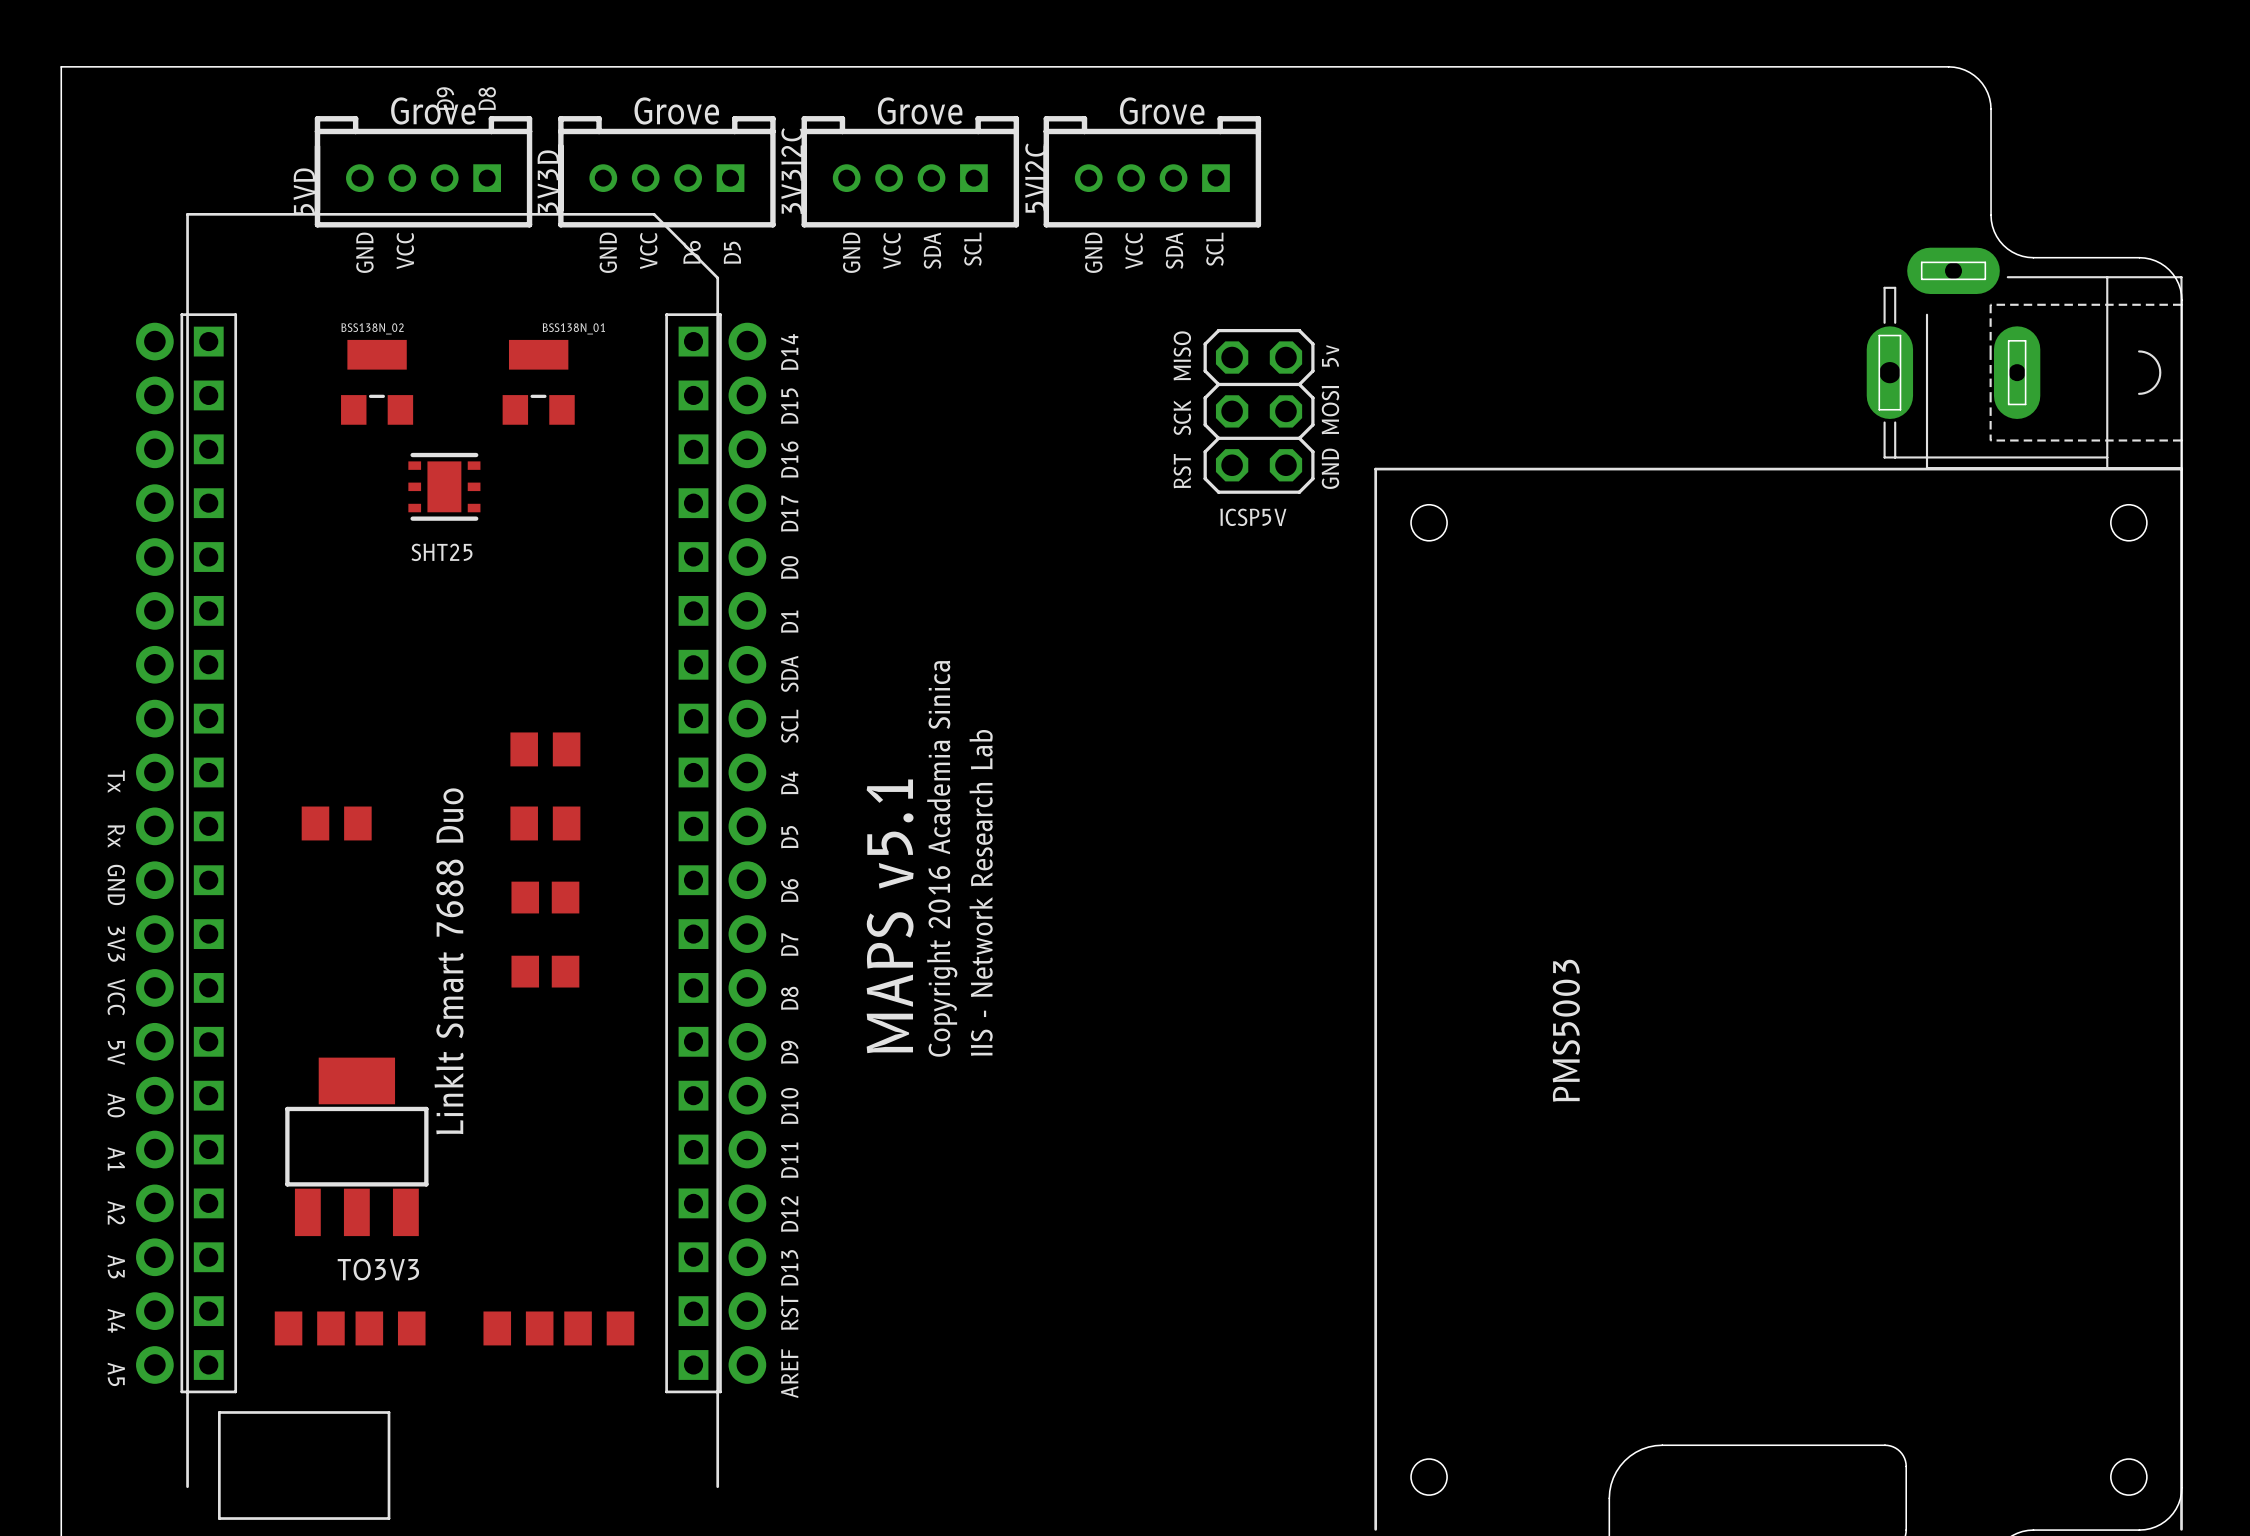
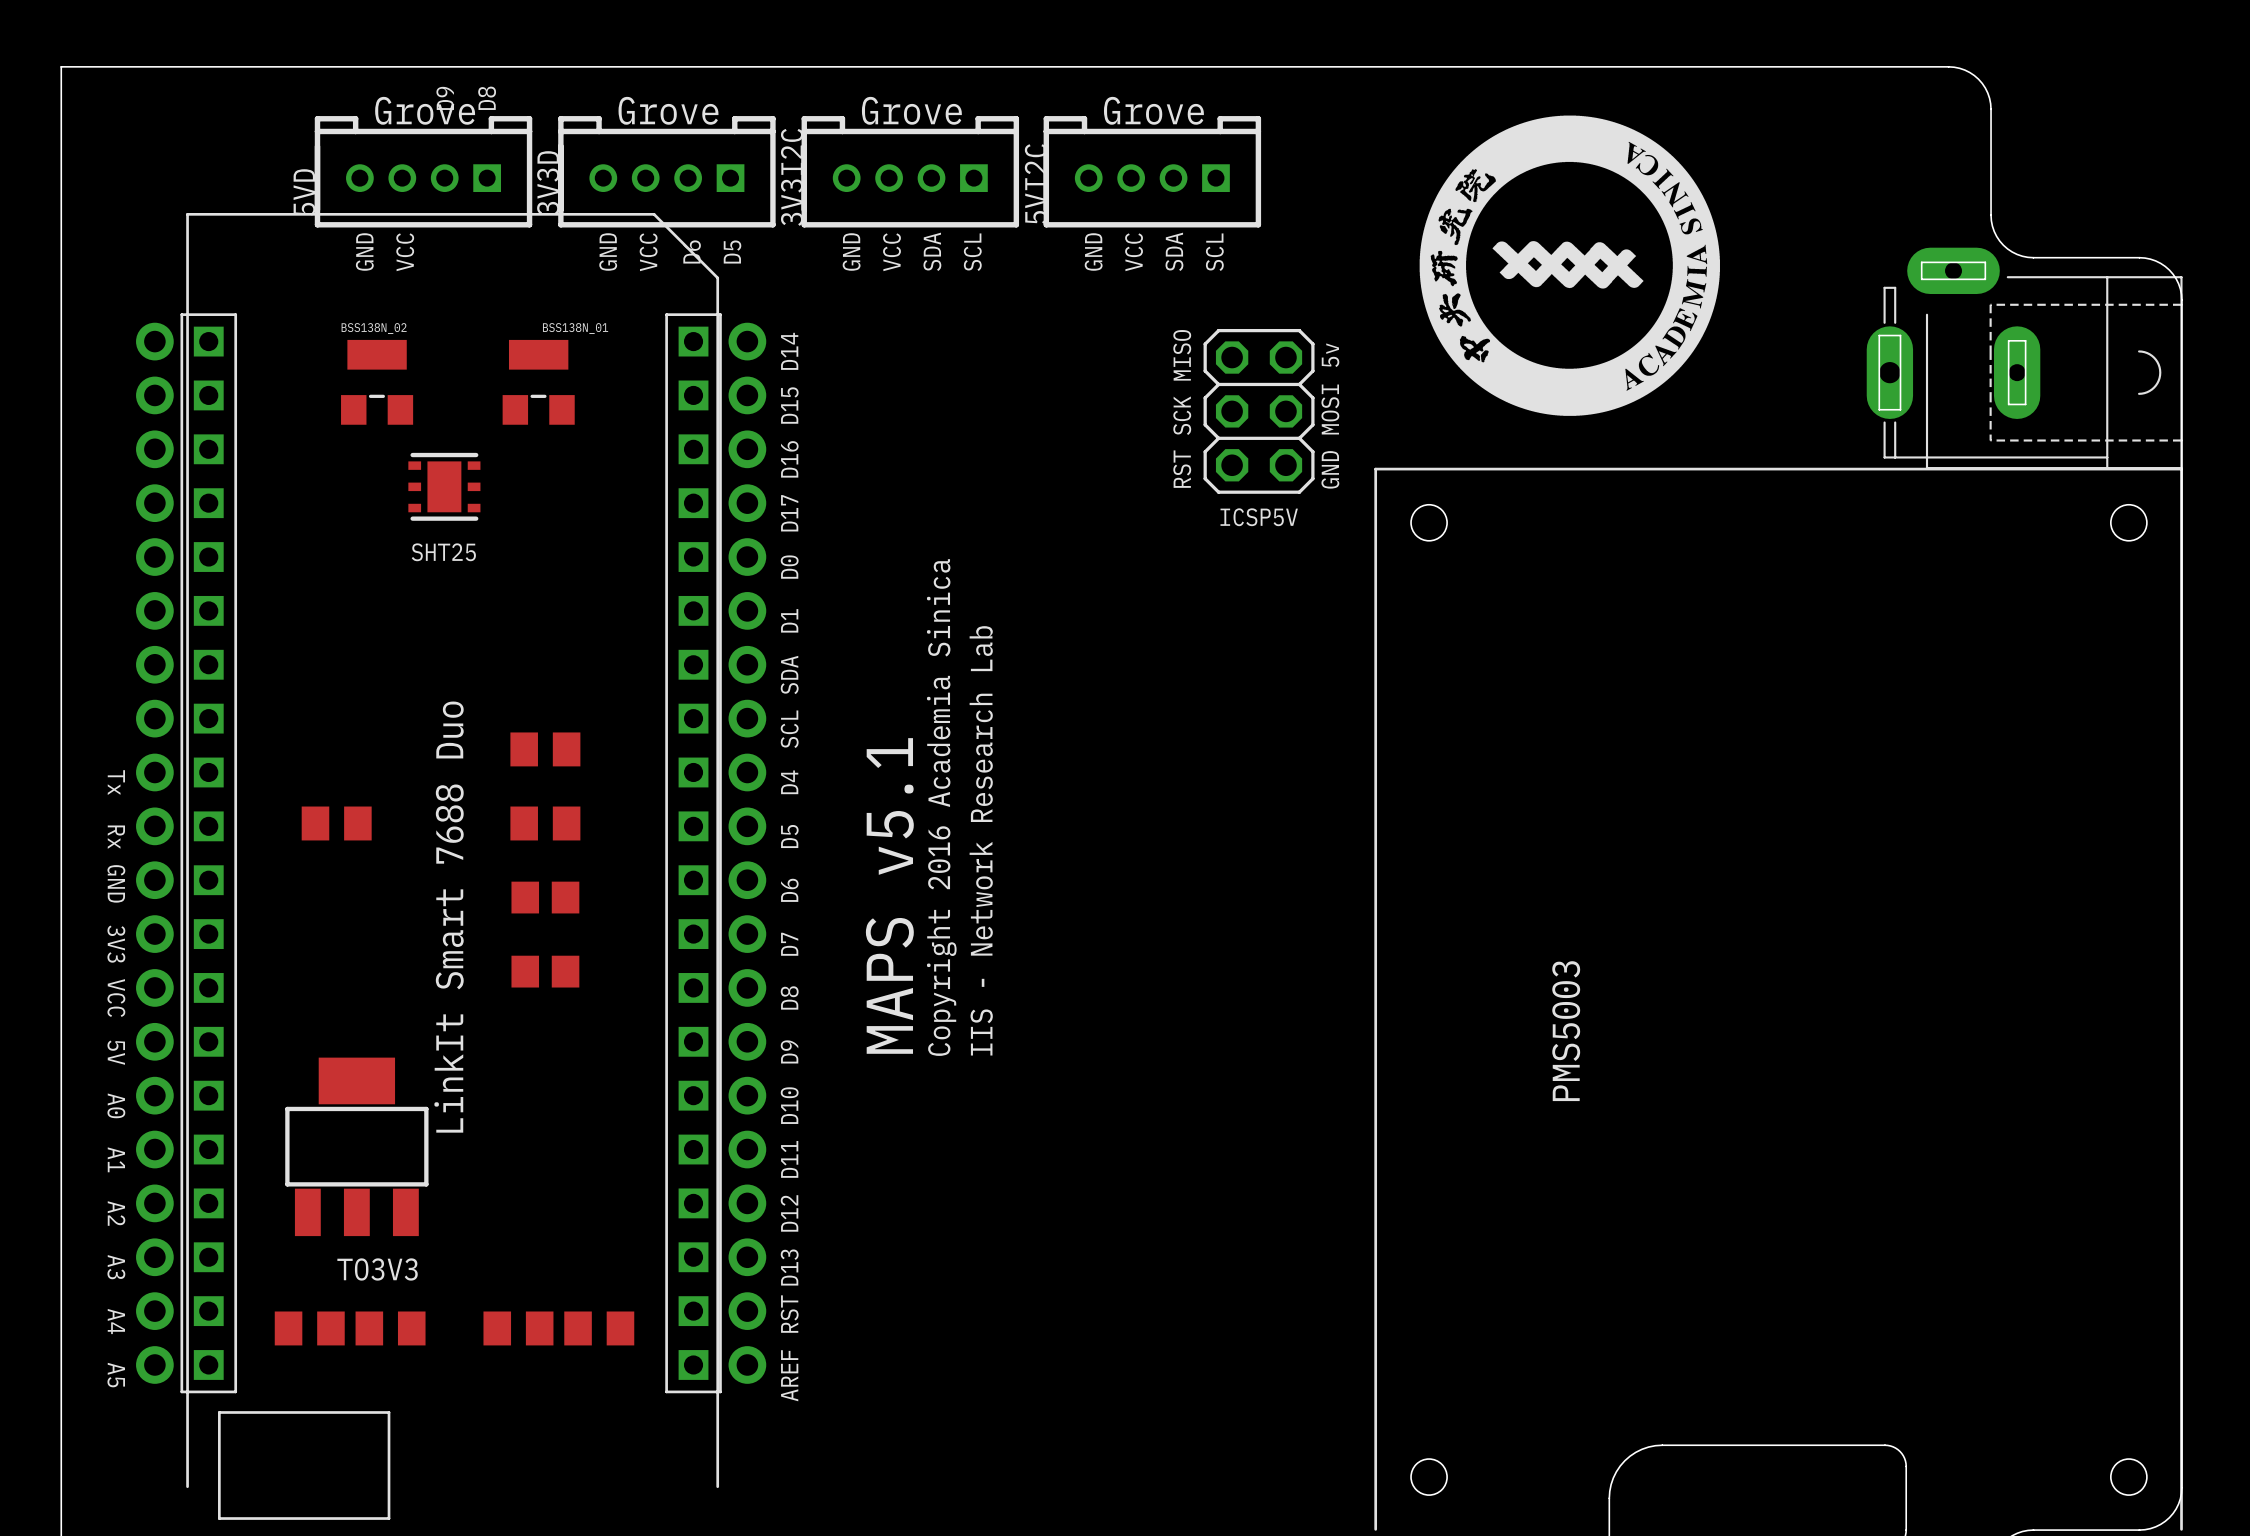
drawing: none -> [1419, 115, 1720, 416]

